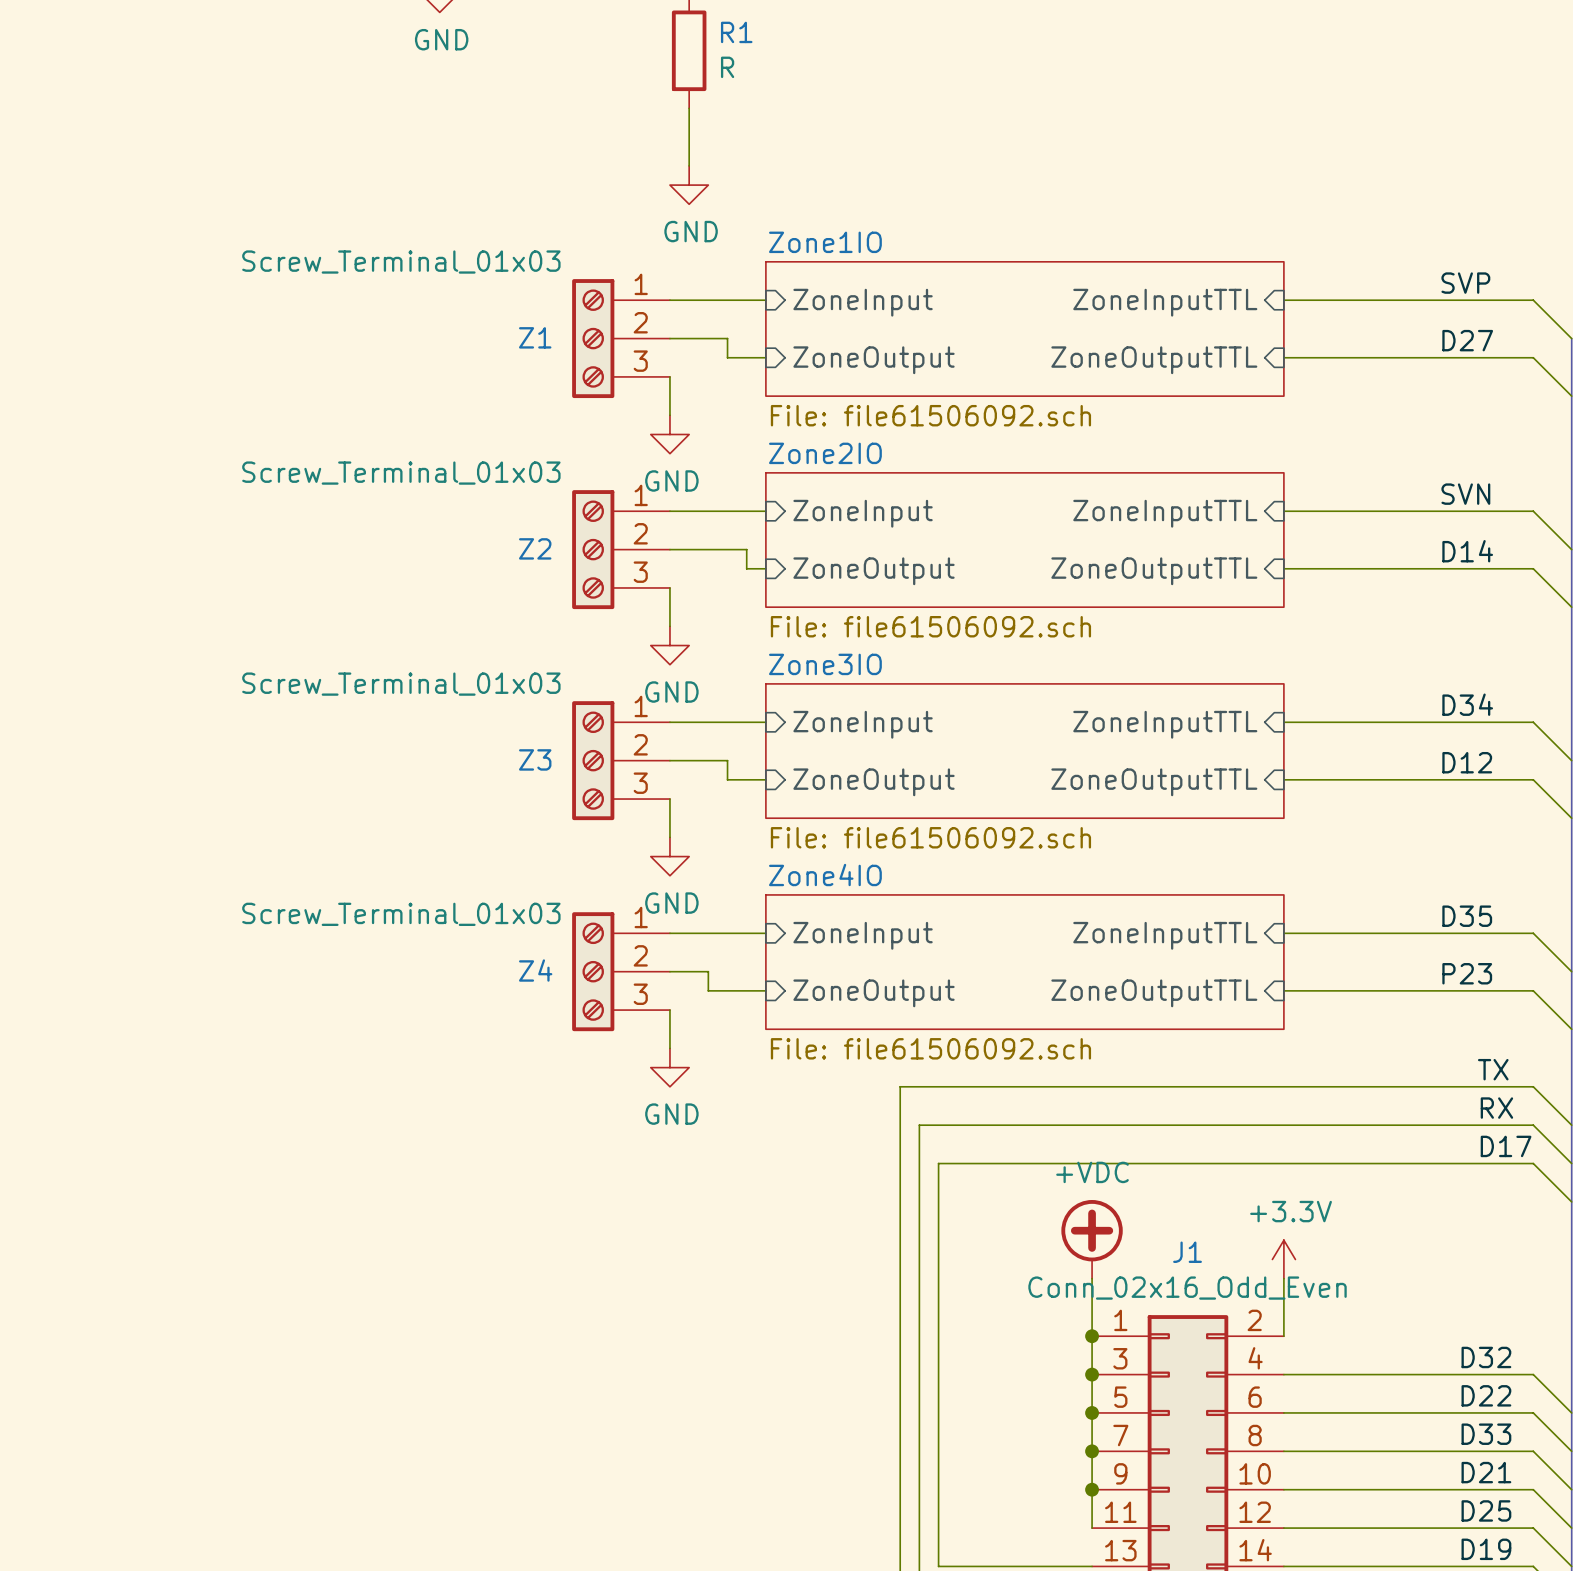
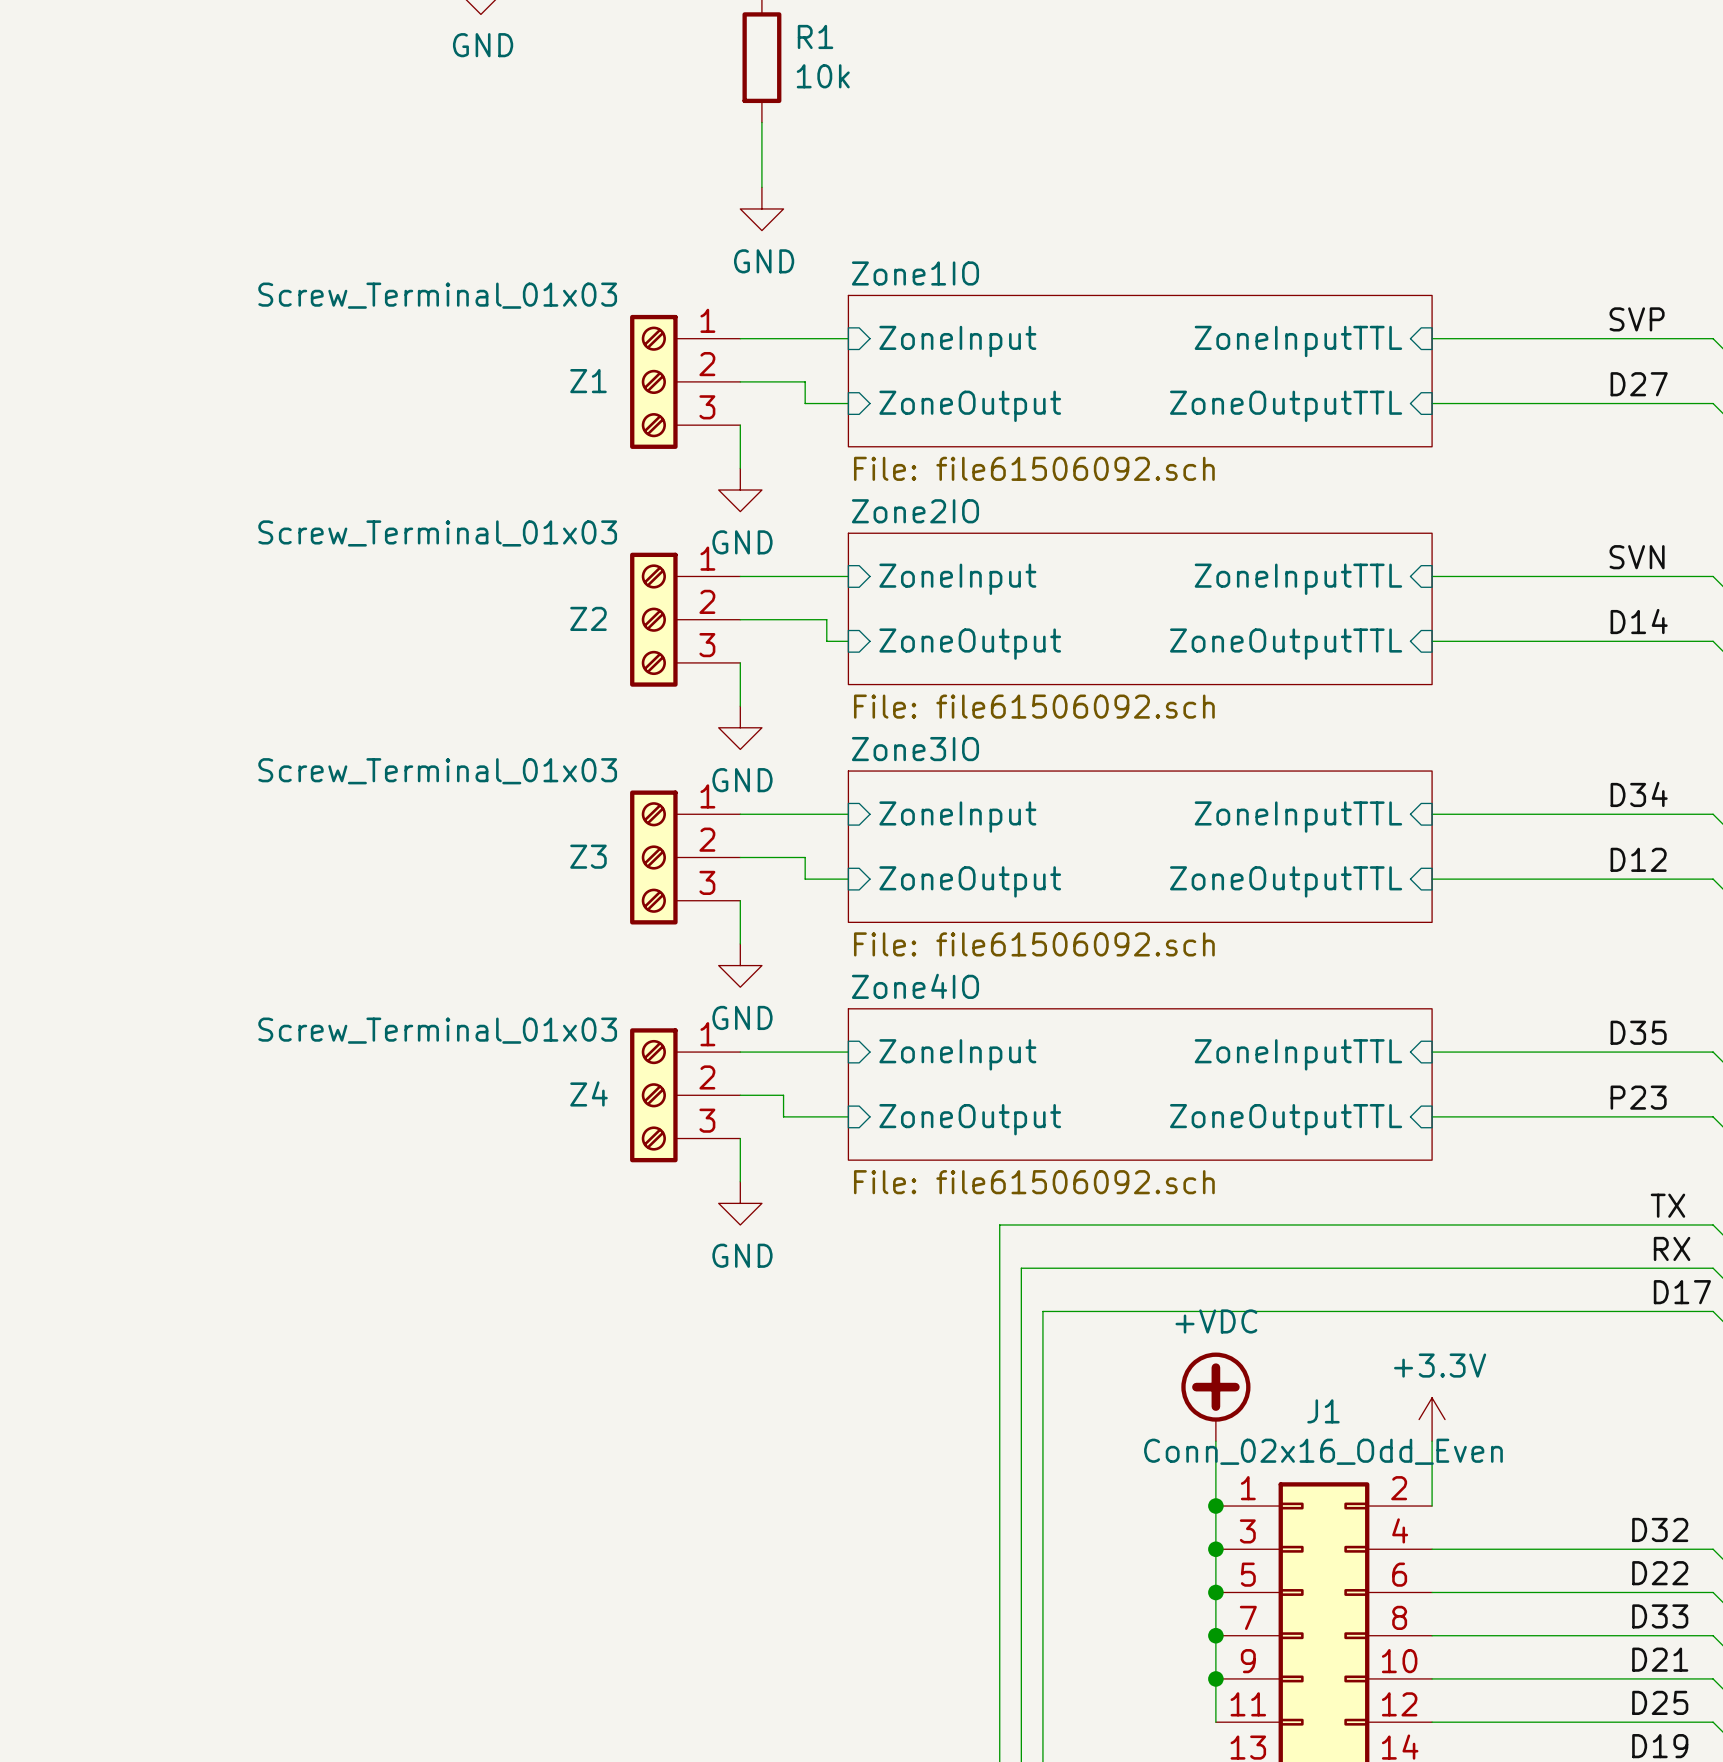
R1 value: R (727, 67) -> 10k (823, 76)

